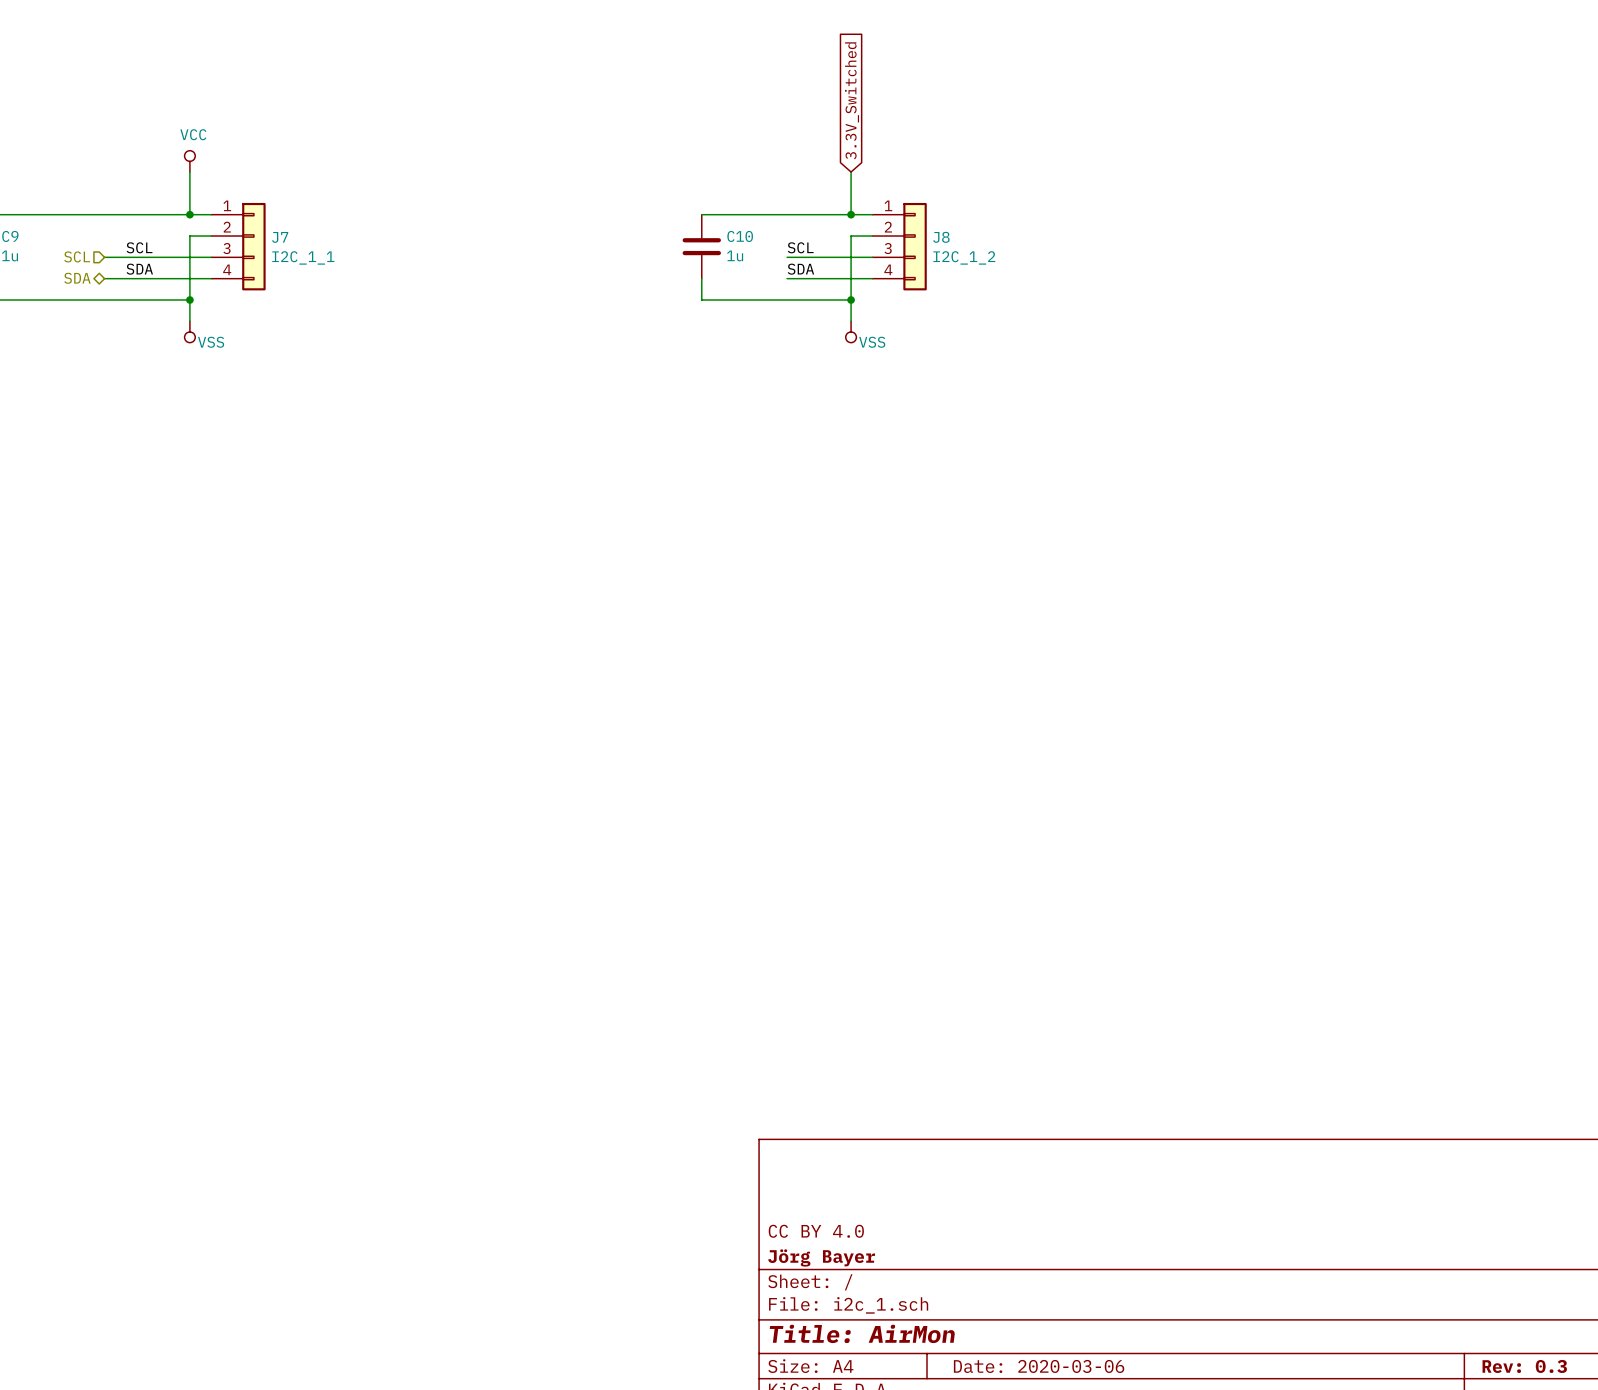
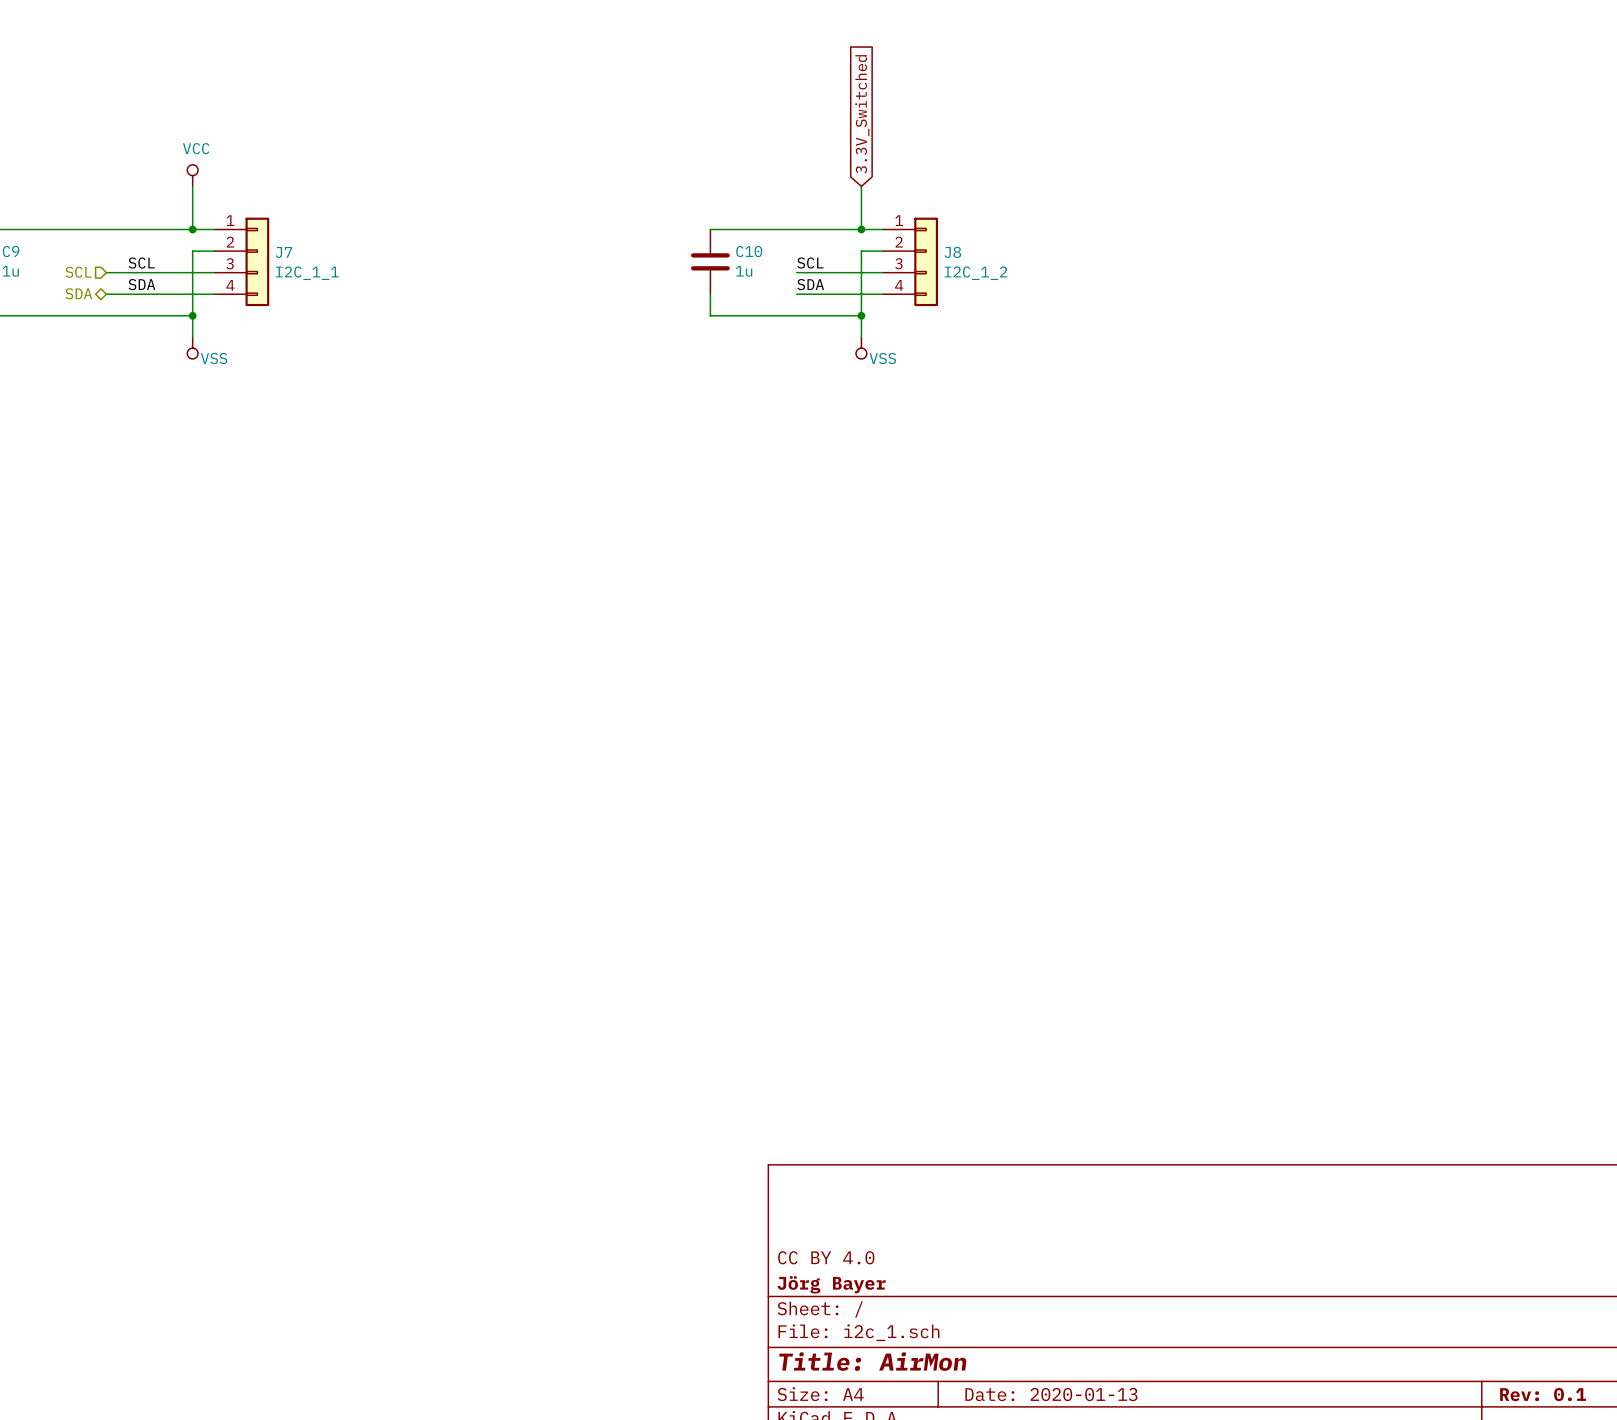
title block: Date: 2020-03-06 (1039, 1366) -> Date: 2020-01-13 (1051, 1394)
title block: Rev: 0.3 (1524, 1366) -> Rev: 0.1 (1543, 1394)

